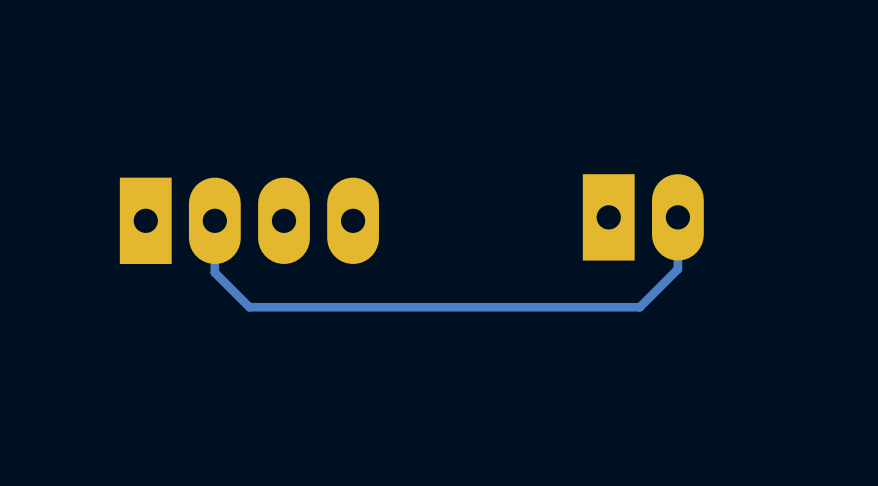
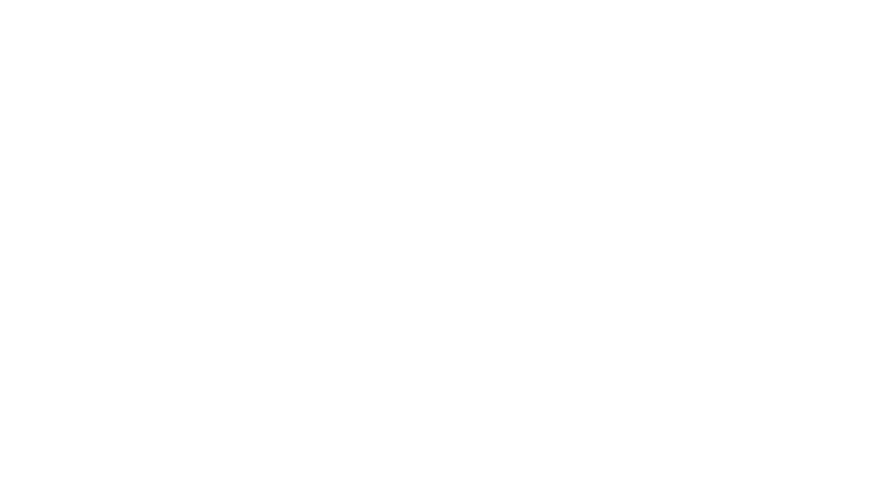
part: (643, 217) -> none
track: (677, 217) (677, 269) (639, 307) (249, 307) (214, 272) (214, 220) -> none
part: (249, 220) -> none

